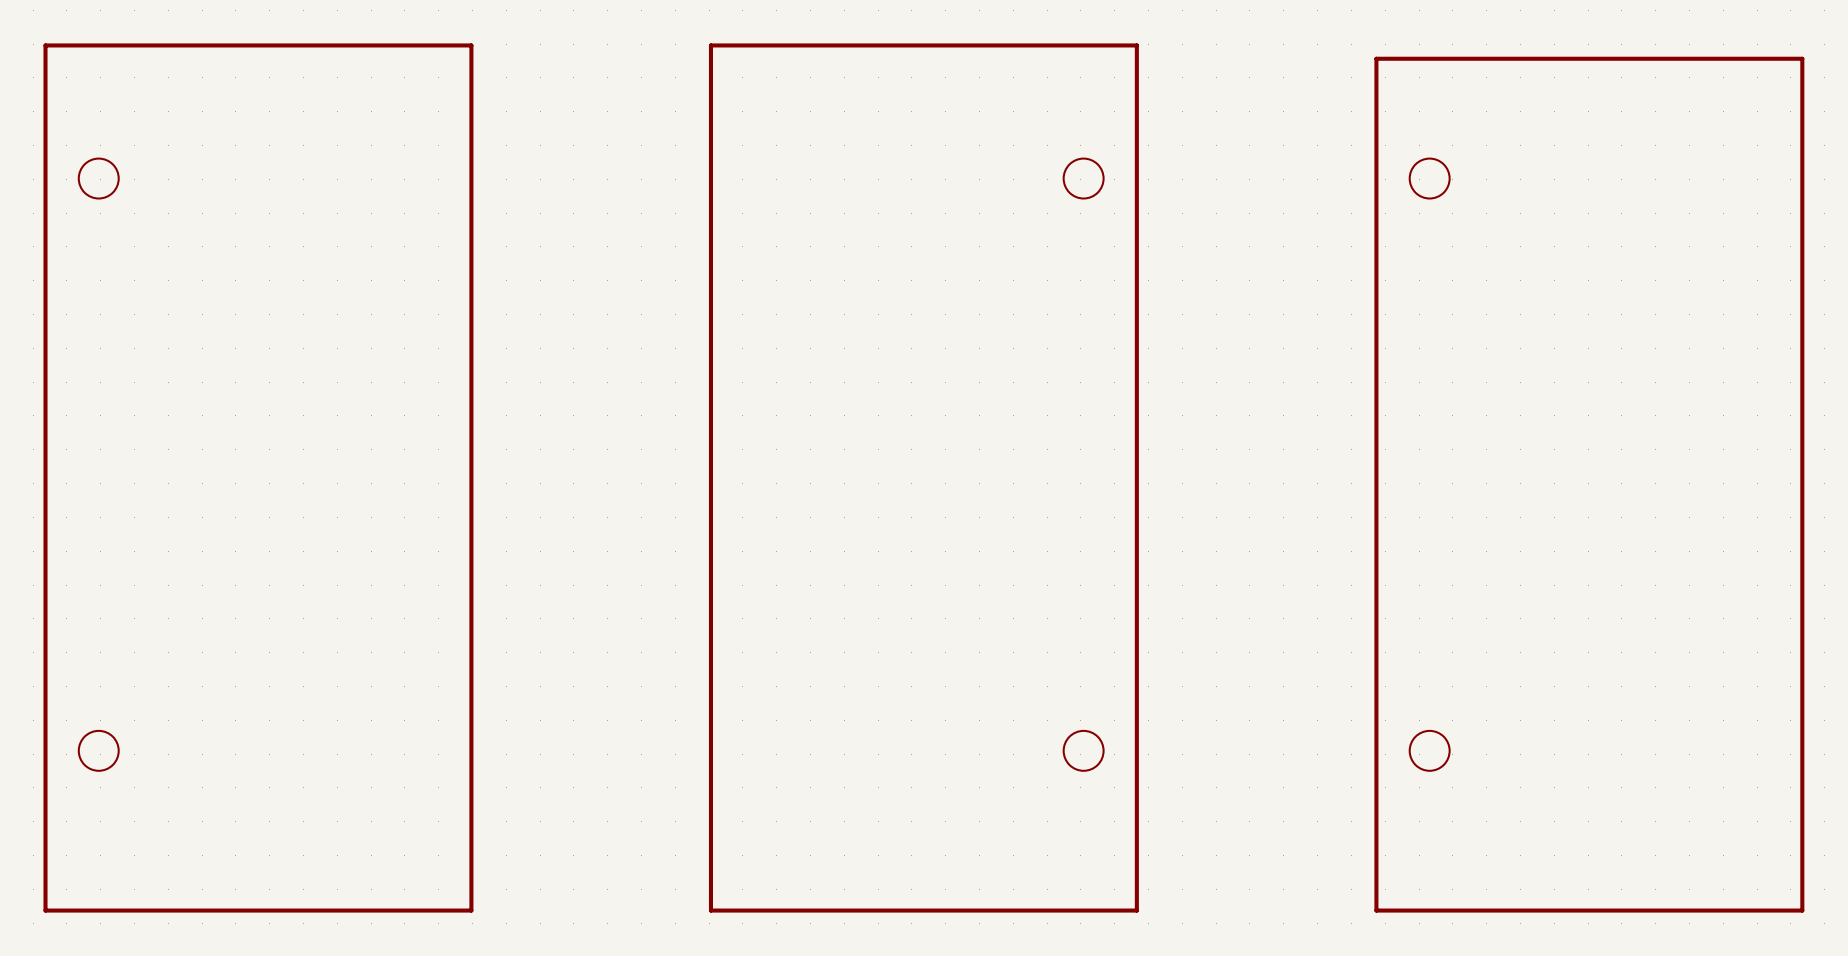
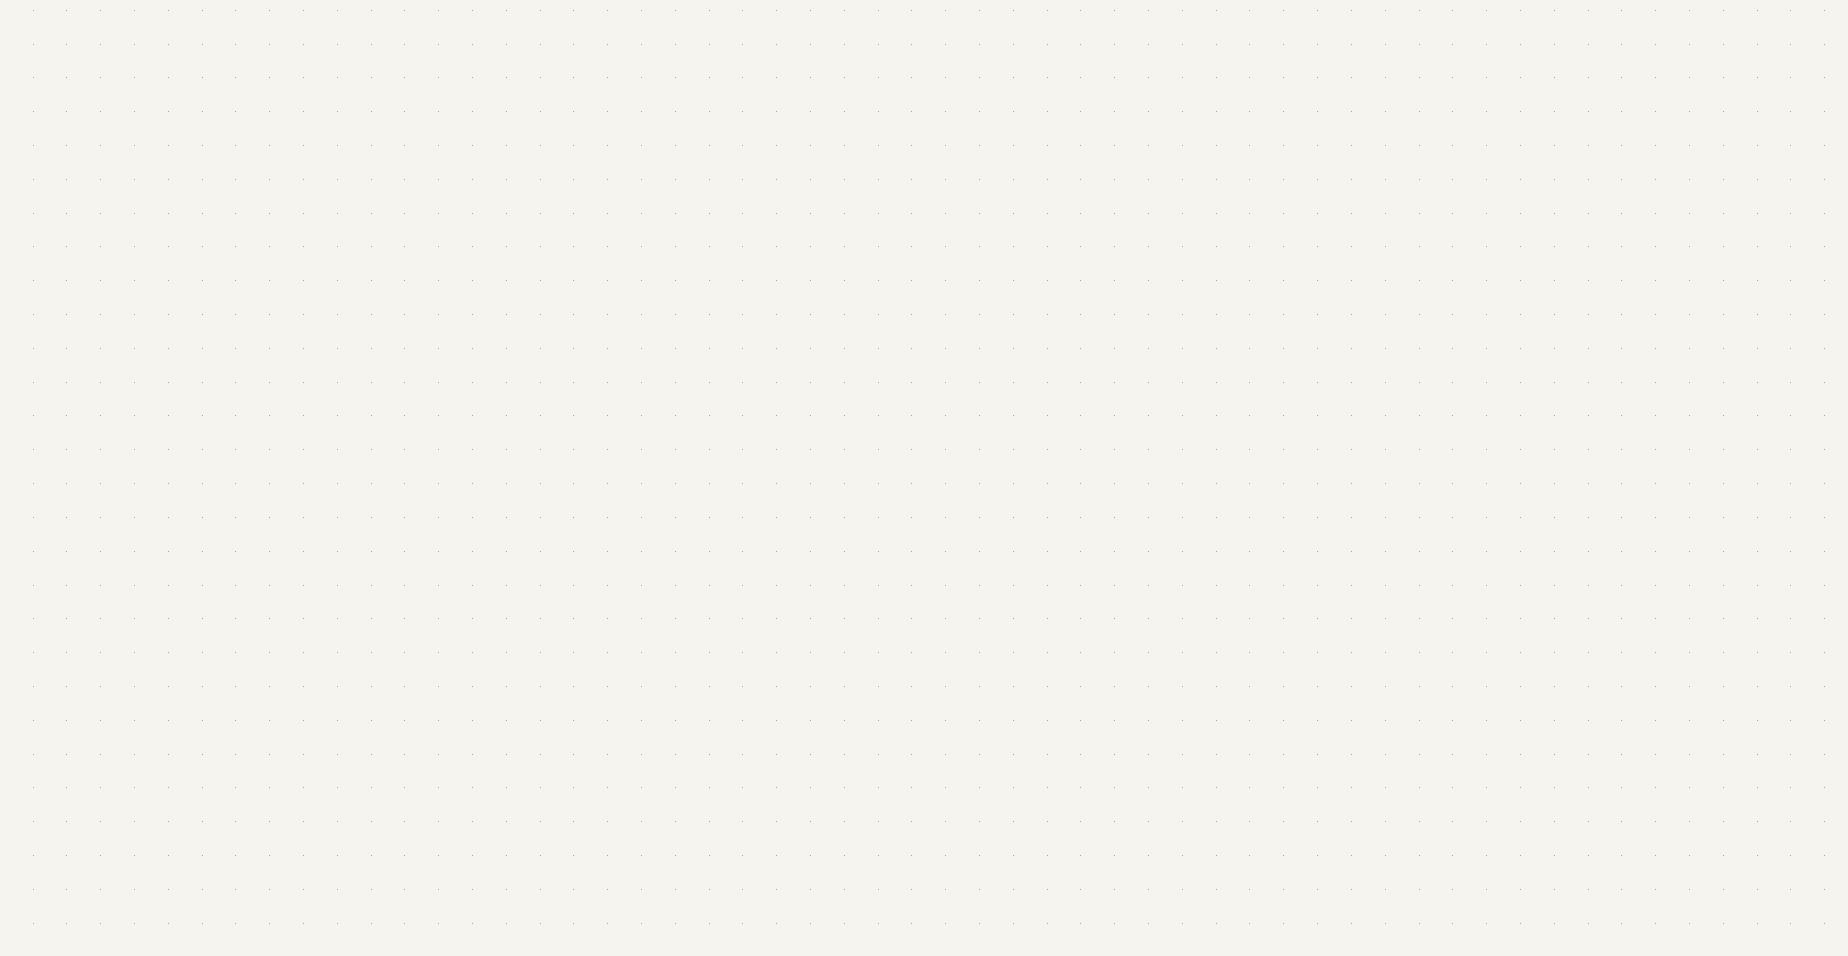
line: (45, 45) (471, 45) (471, 910) (45, 910) (45, 45) -> none
line: (710, 45) (1136, 45) (1136, 910) (710, 910) (710, 45) -> none
line: (1376, 58) (1802, 58) (1802, 910) (1376, 910) (1376, 58) -> none
drawing: [77, 157, 120, 200] -> none
drawing: [1062, 157, 1105, 200] -> none
drawing: [1408, 157, 1451, 200] -> none
drawing: [77, 729, 120, 772] -> none
drawing: [1062, 729, 1105, 772] -> none
drawing: [1408, 729, 1451, 772] -> none

